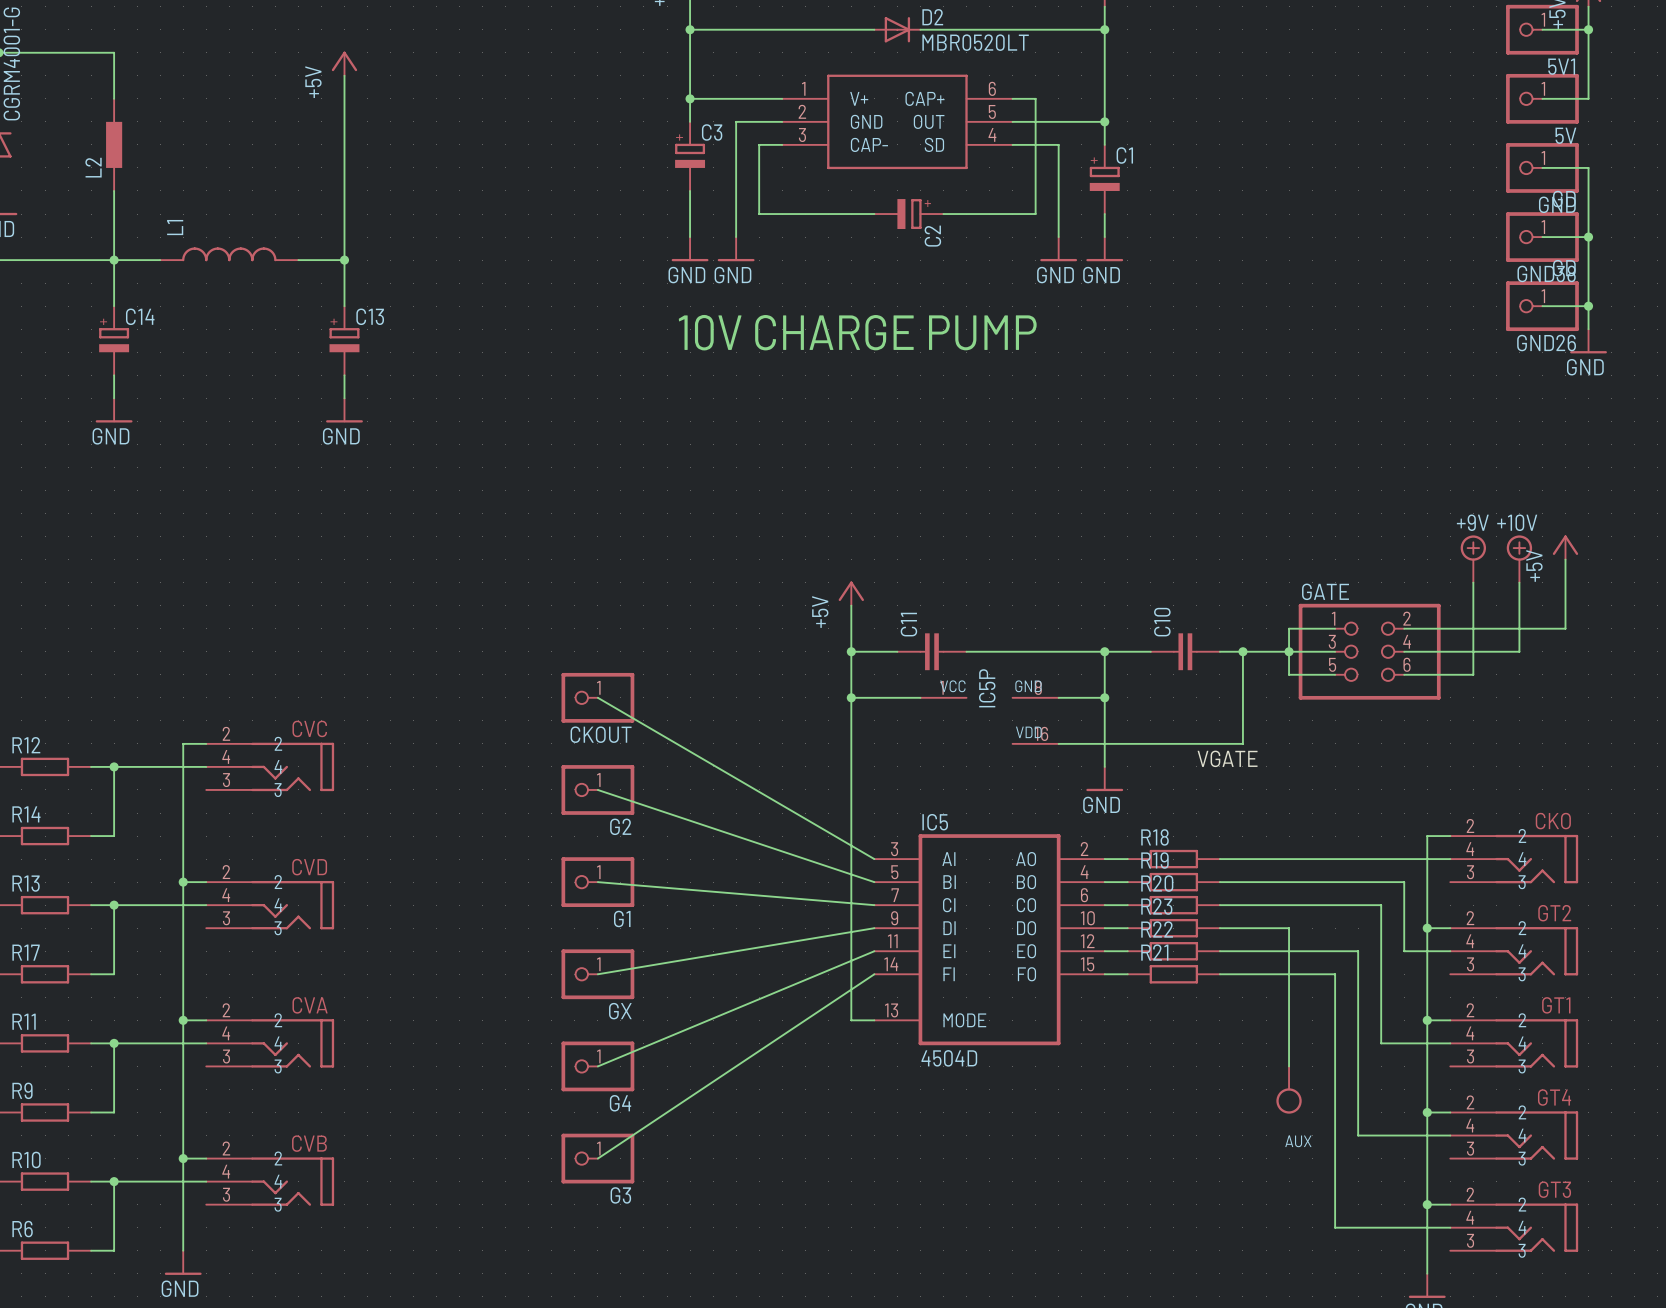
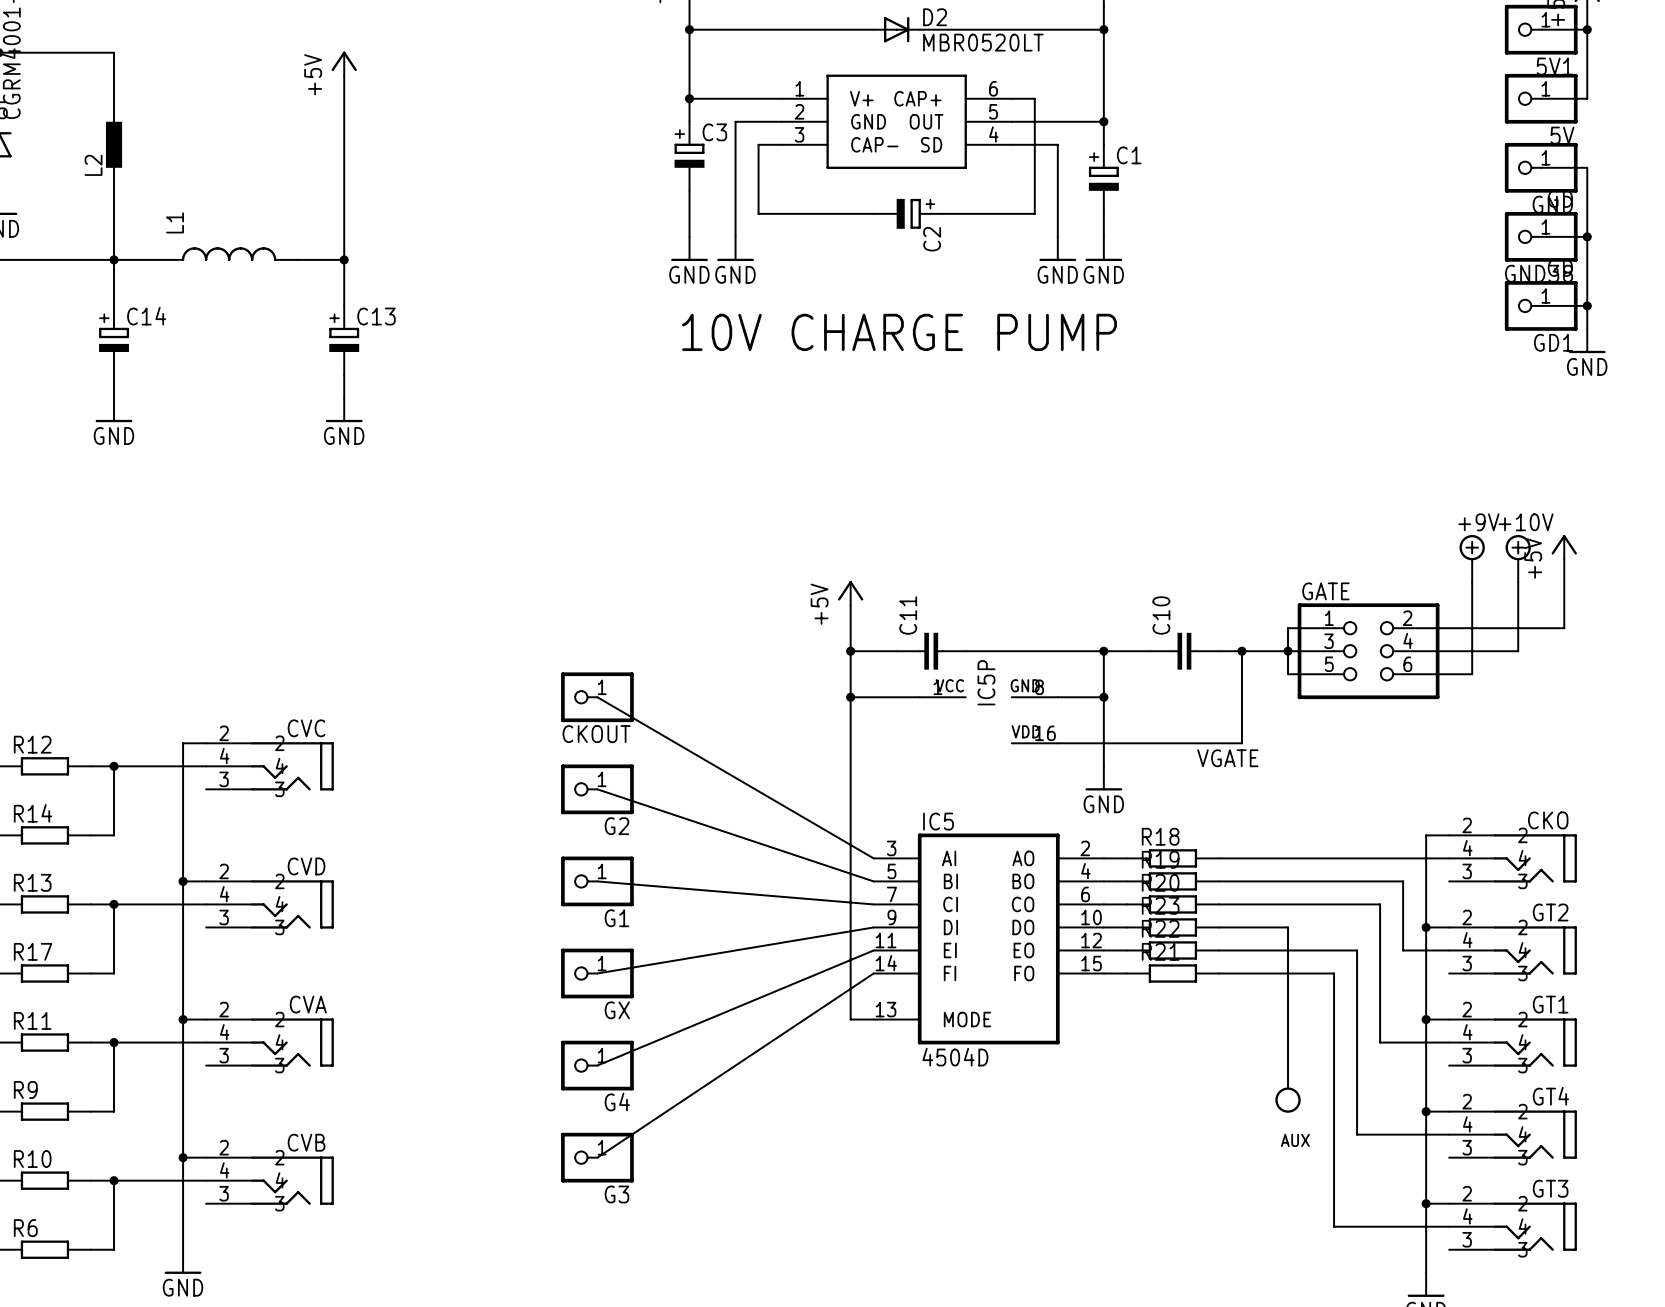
GND26 name: GND26 (1546, 343) -> GD1 (1553, 342)

